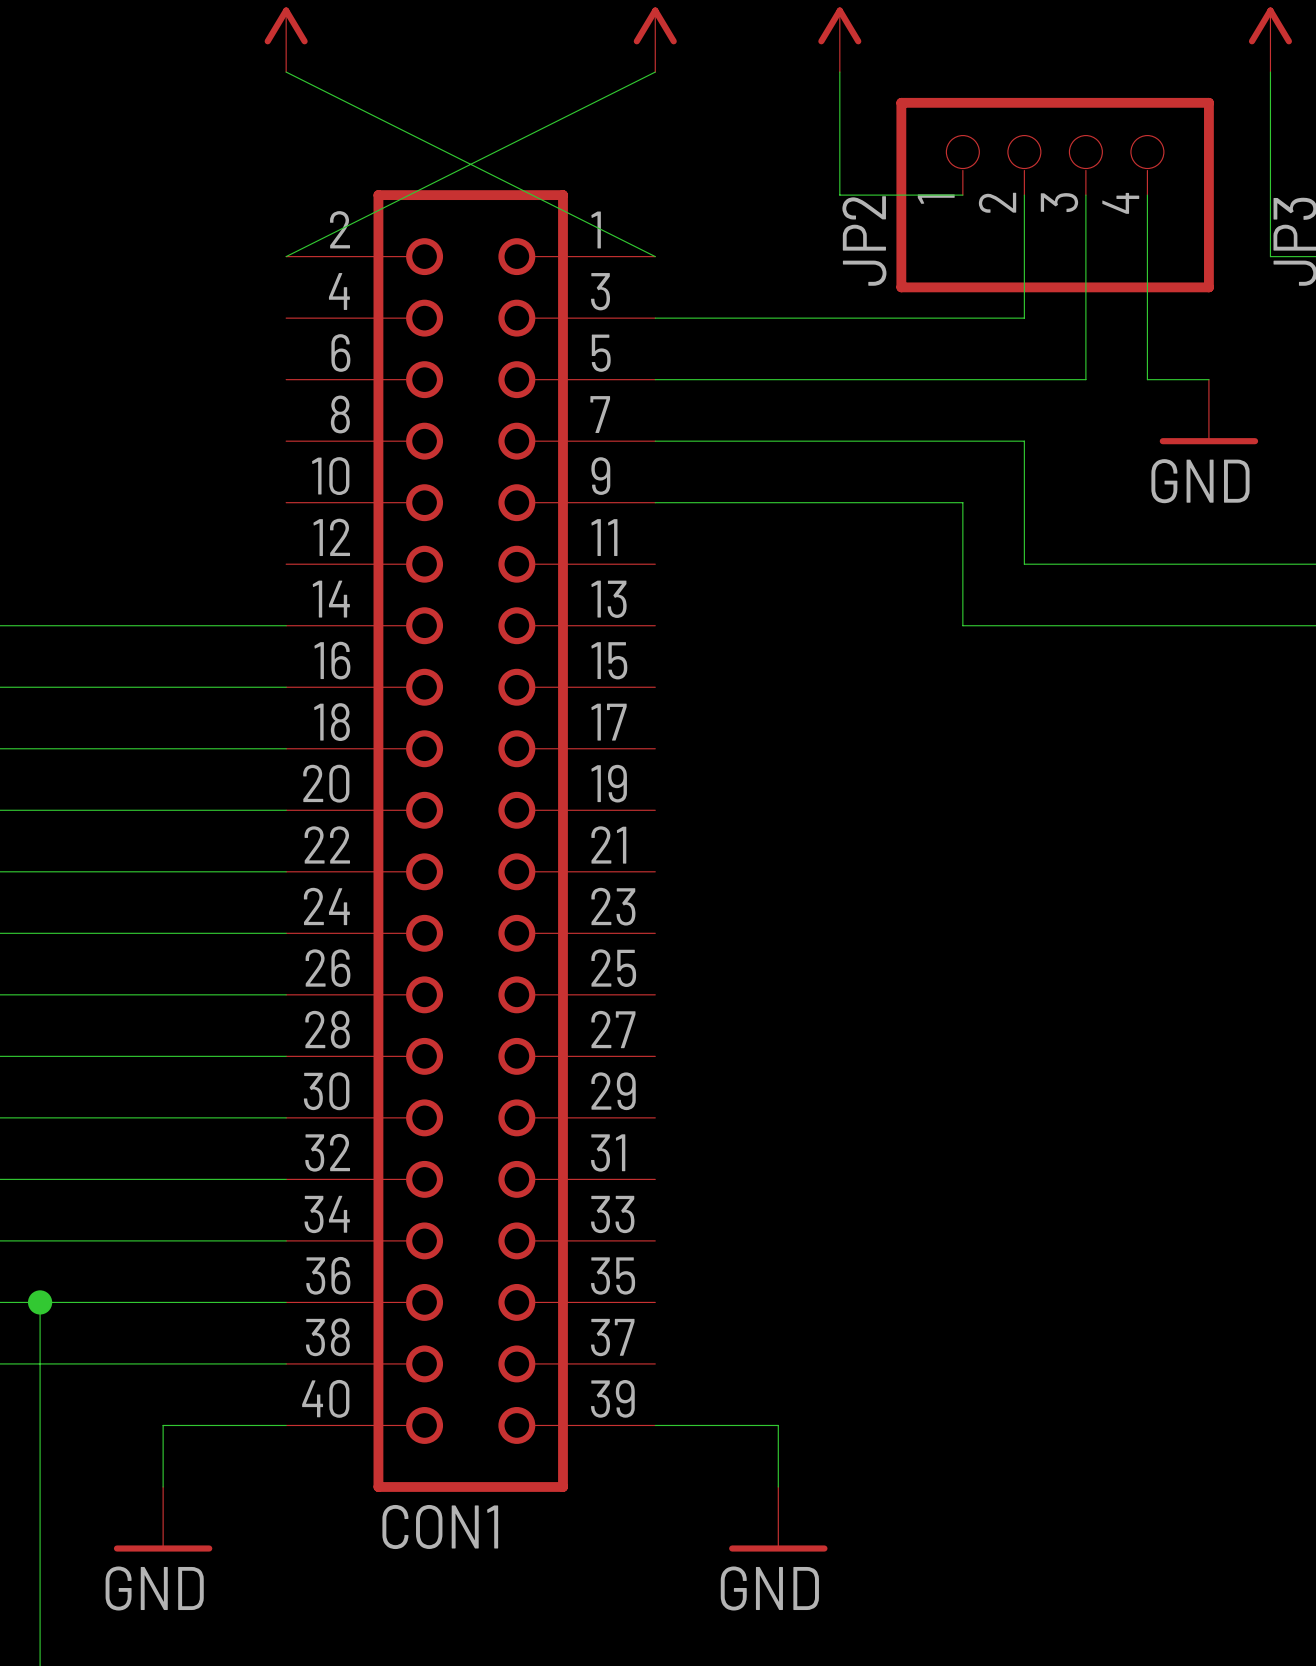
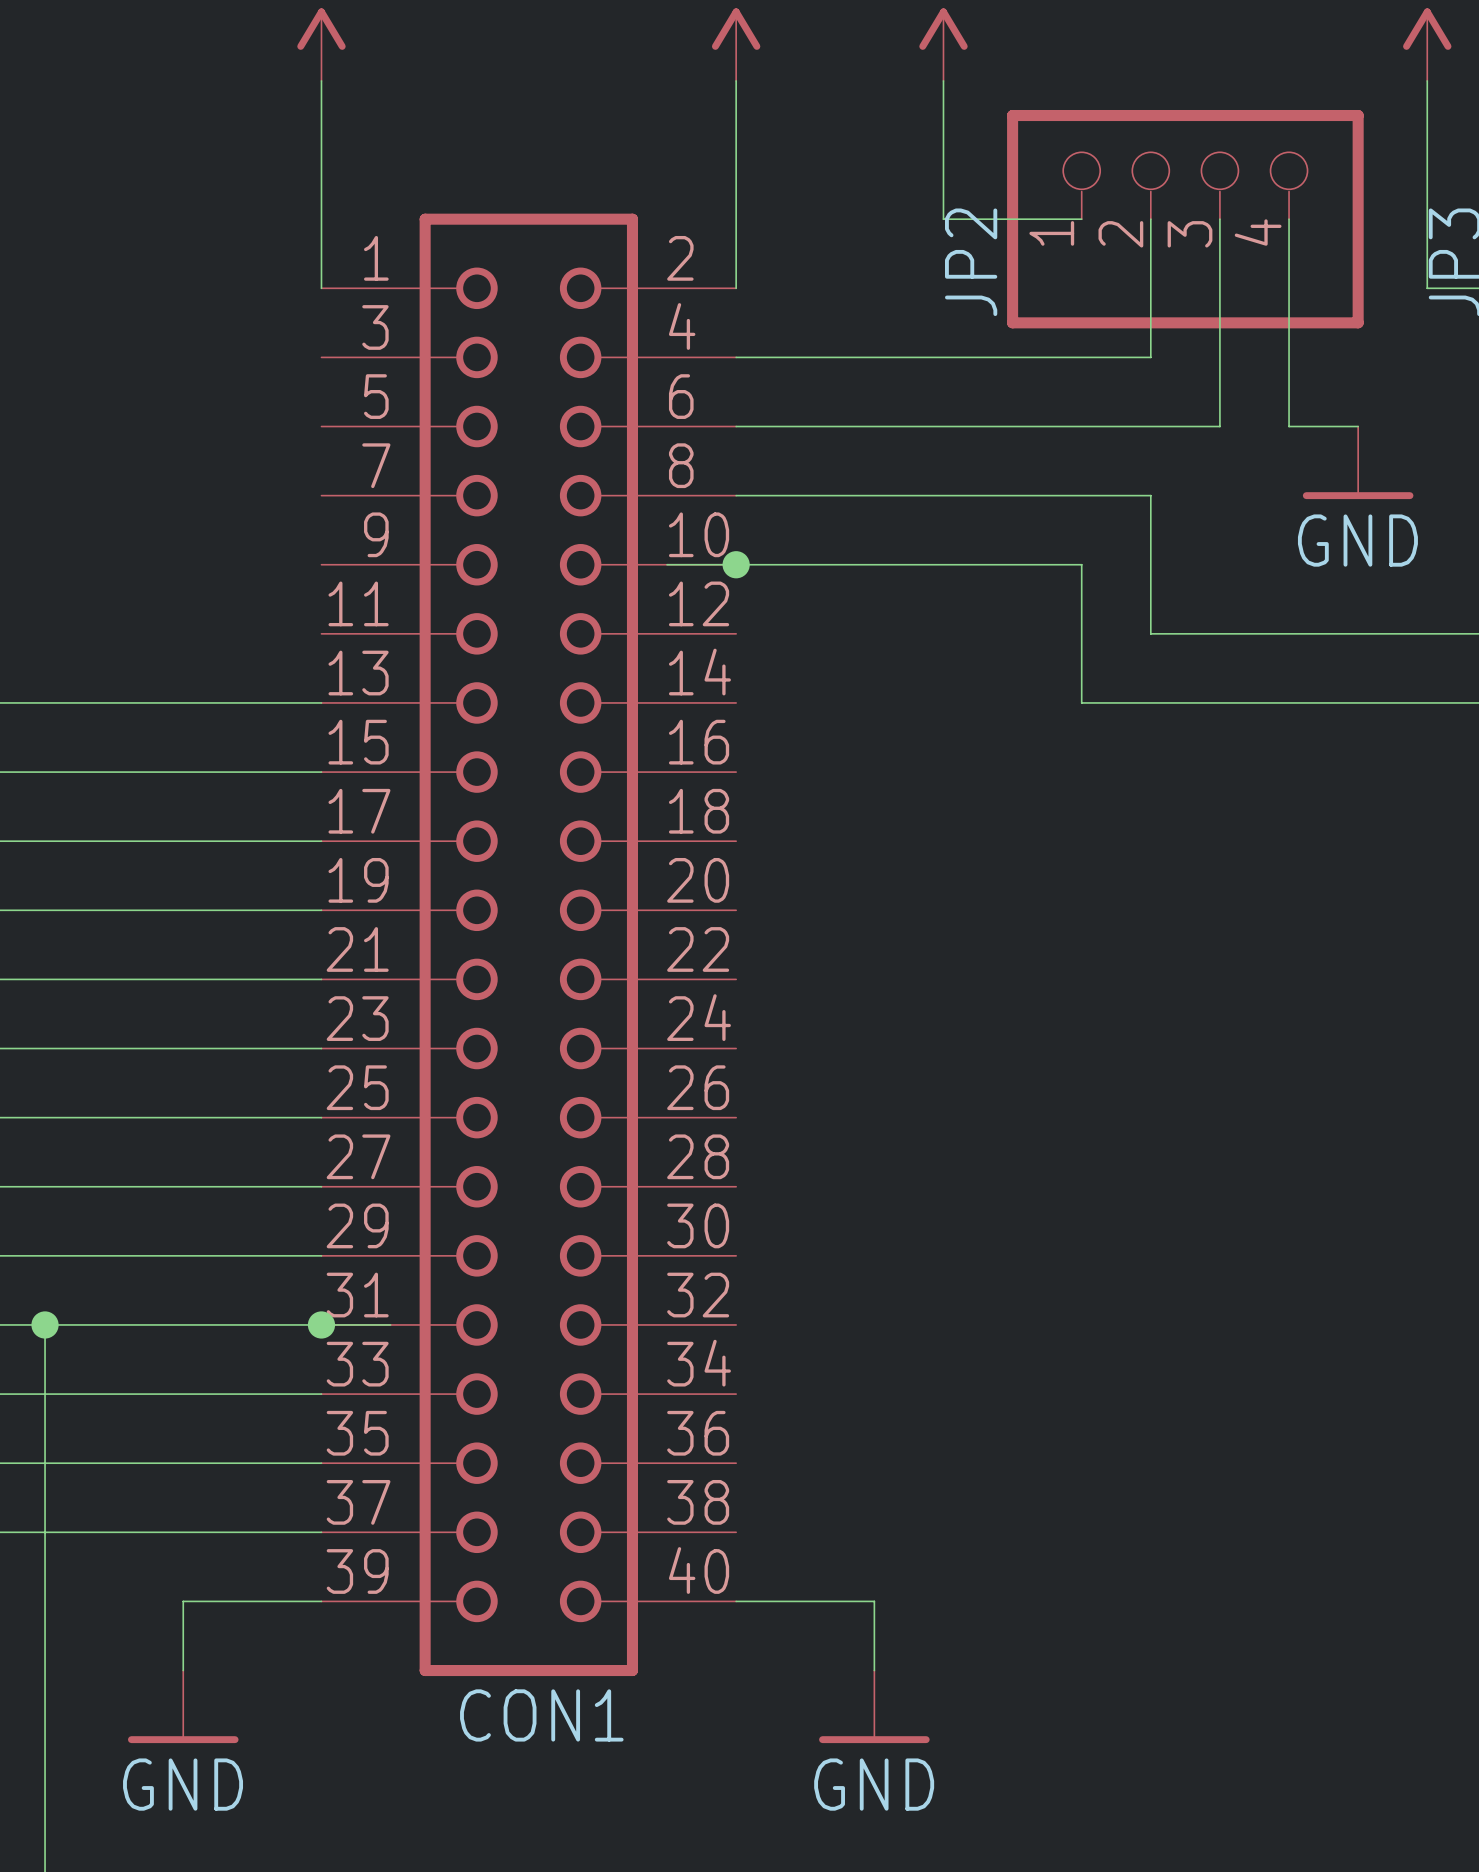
wire: (286, 72) (655, 256) -> (321, 80) (321, 288)
wire: (655, 72) (286, 256) -> (736, 80) (736, 288)
junction: none -> (736, 564)
CON1 flip: as is (470, 841) -> left-right (528, 944)
wire: none -> (45, 1324) (45, 1463)
junction: none -> (45, 1324)
junction: none -> (321, 1324)
junction: (40, 1302) -> none

